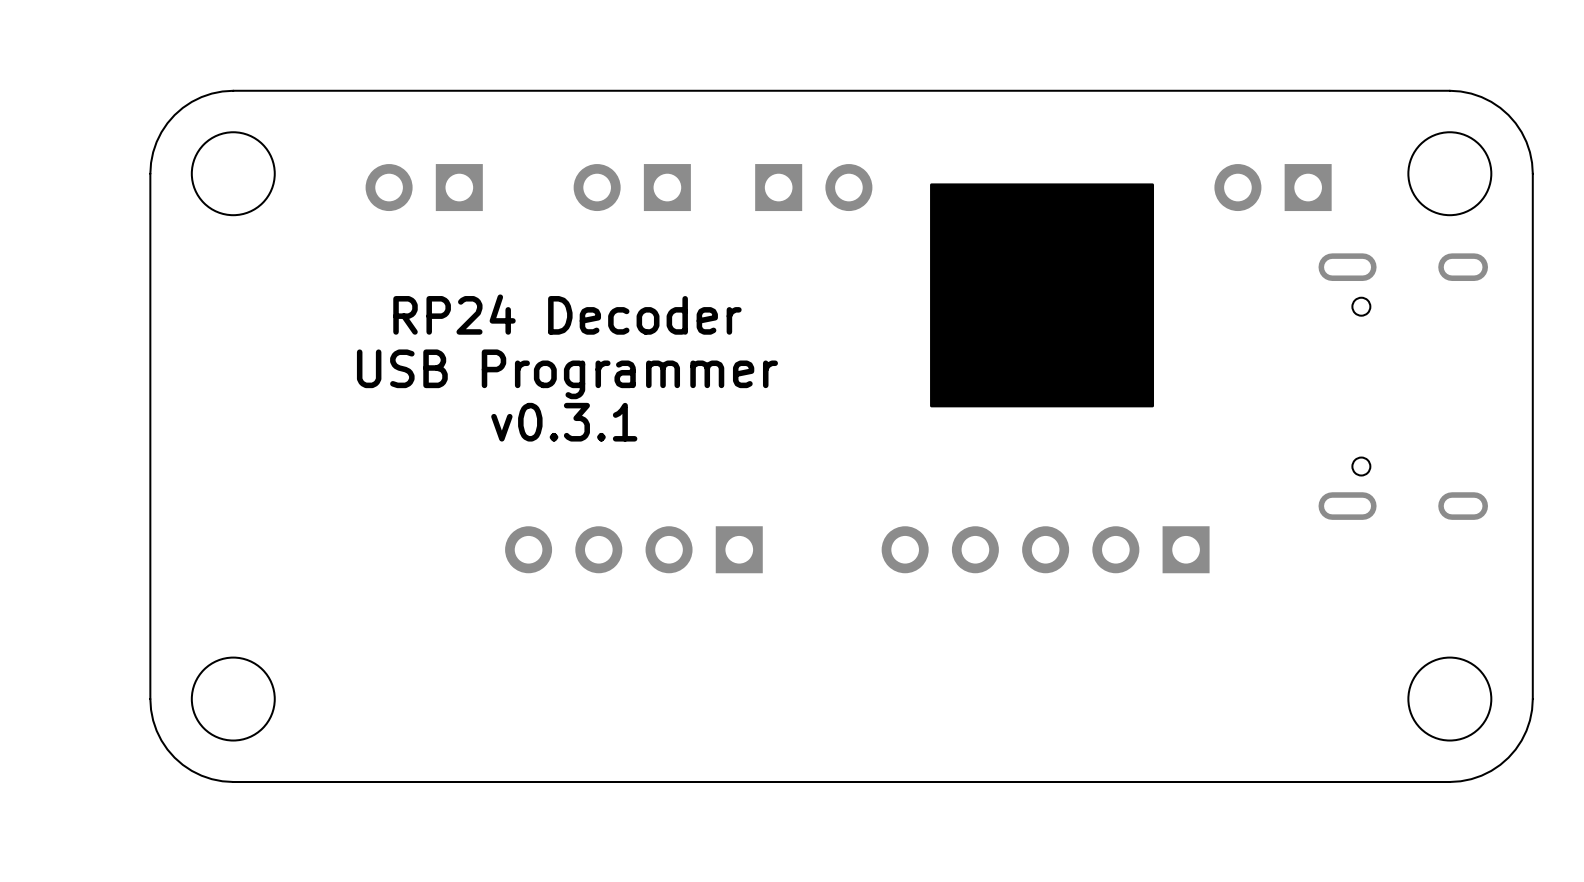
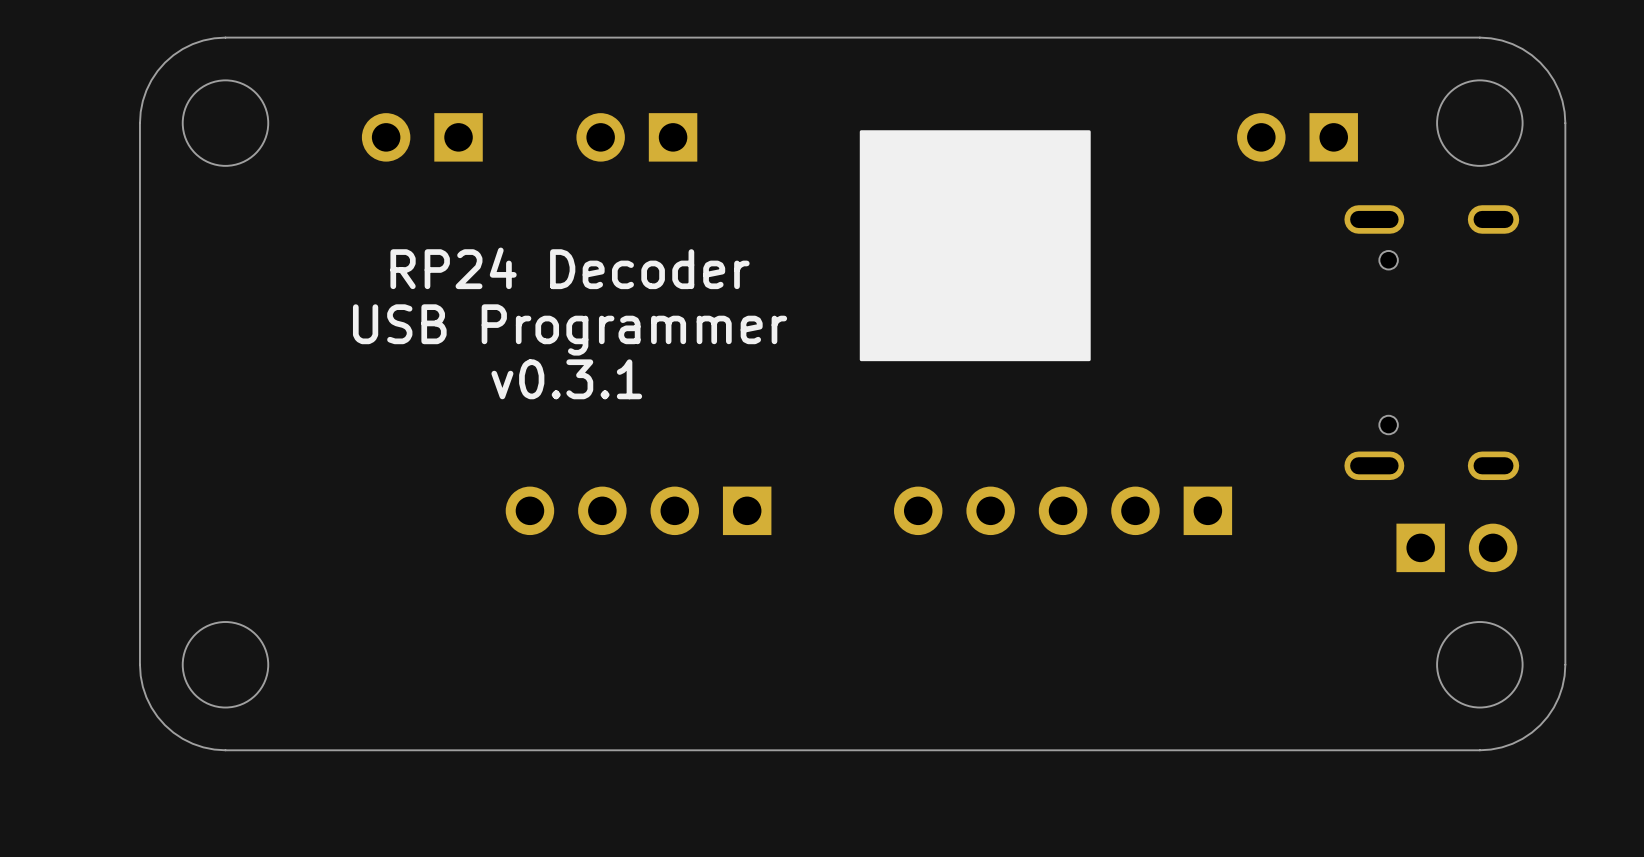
part: (813, 187) -> none
drawing position: (1042, 295) -> (975, 245)
part: none -> (1456, 547)

